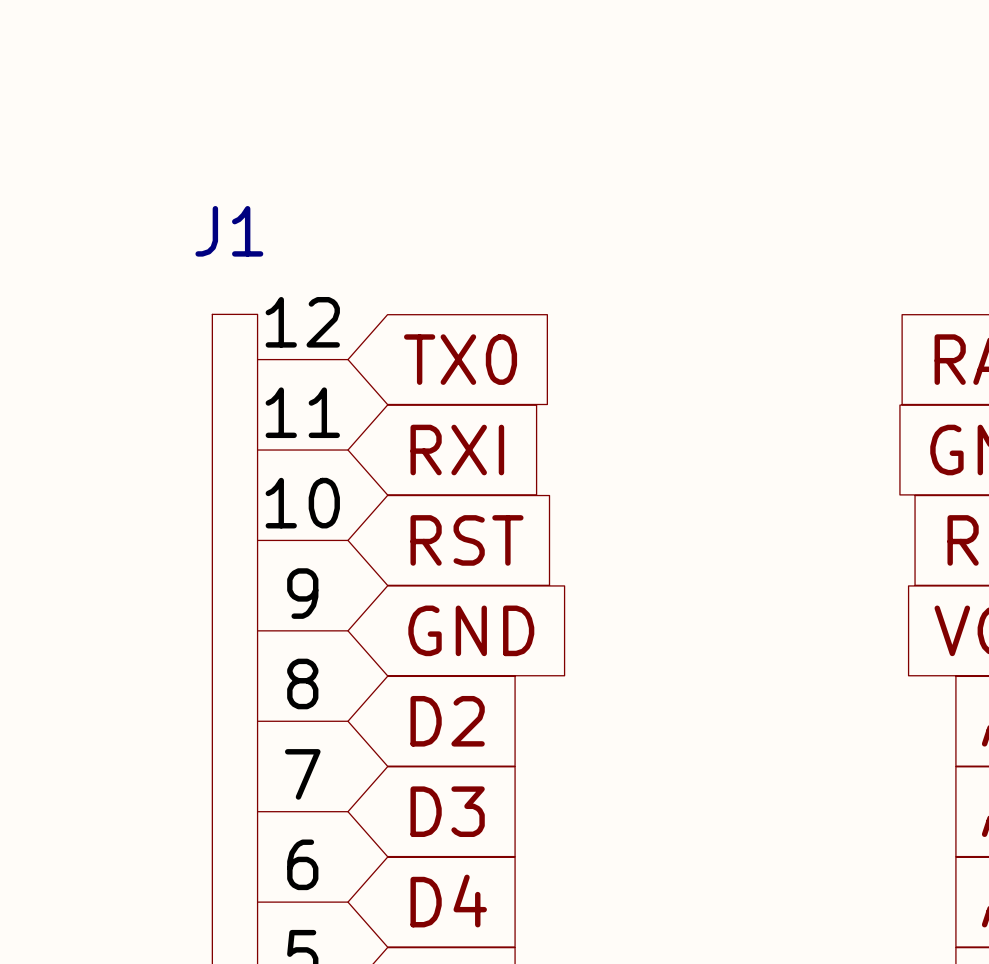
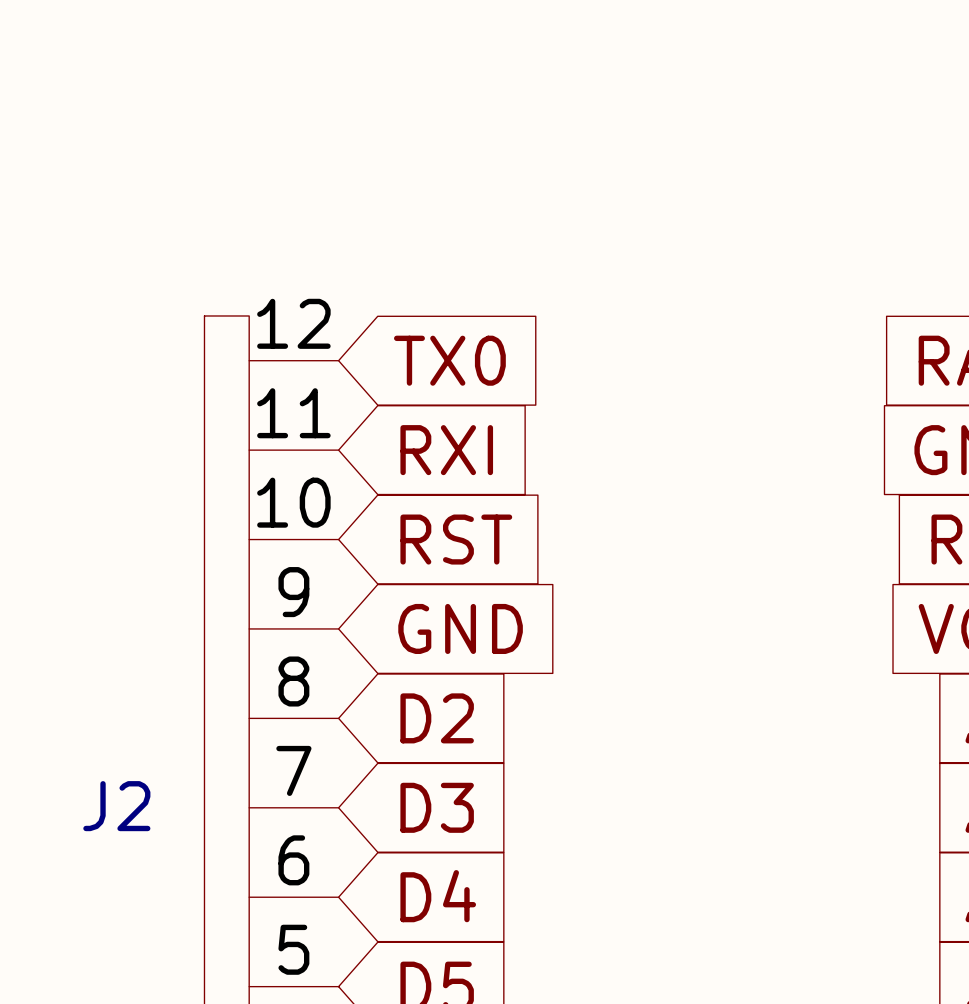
J1 name: J1 (229, 231) -> J2 (116, 806)

